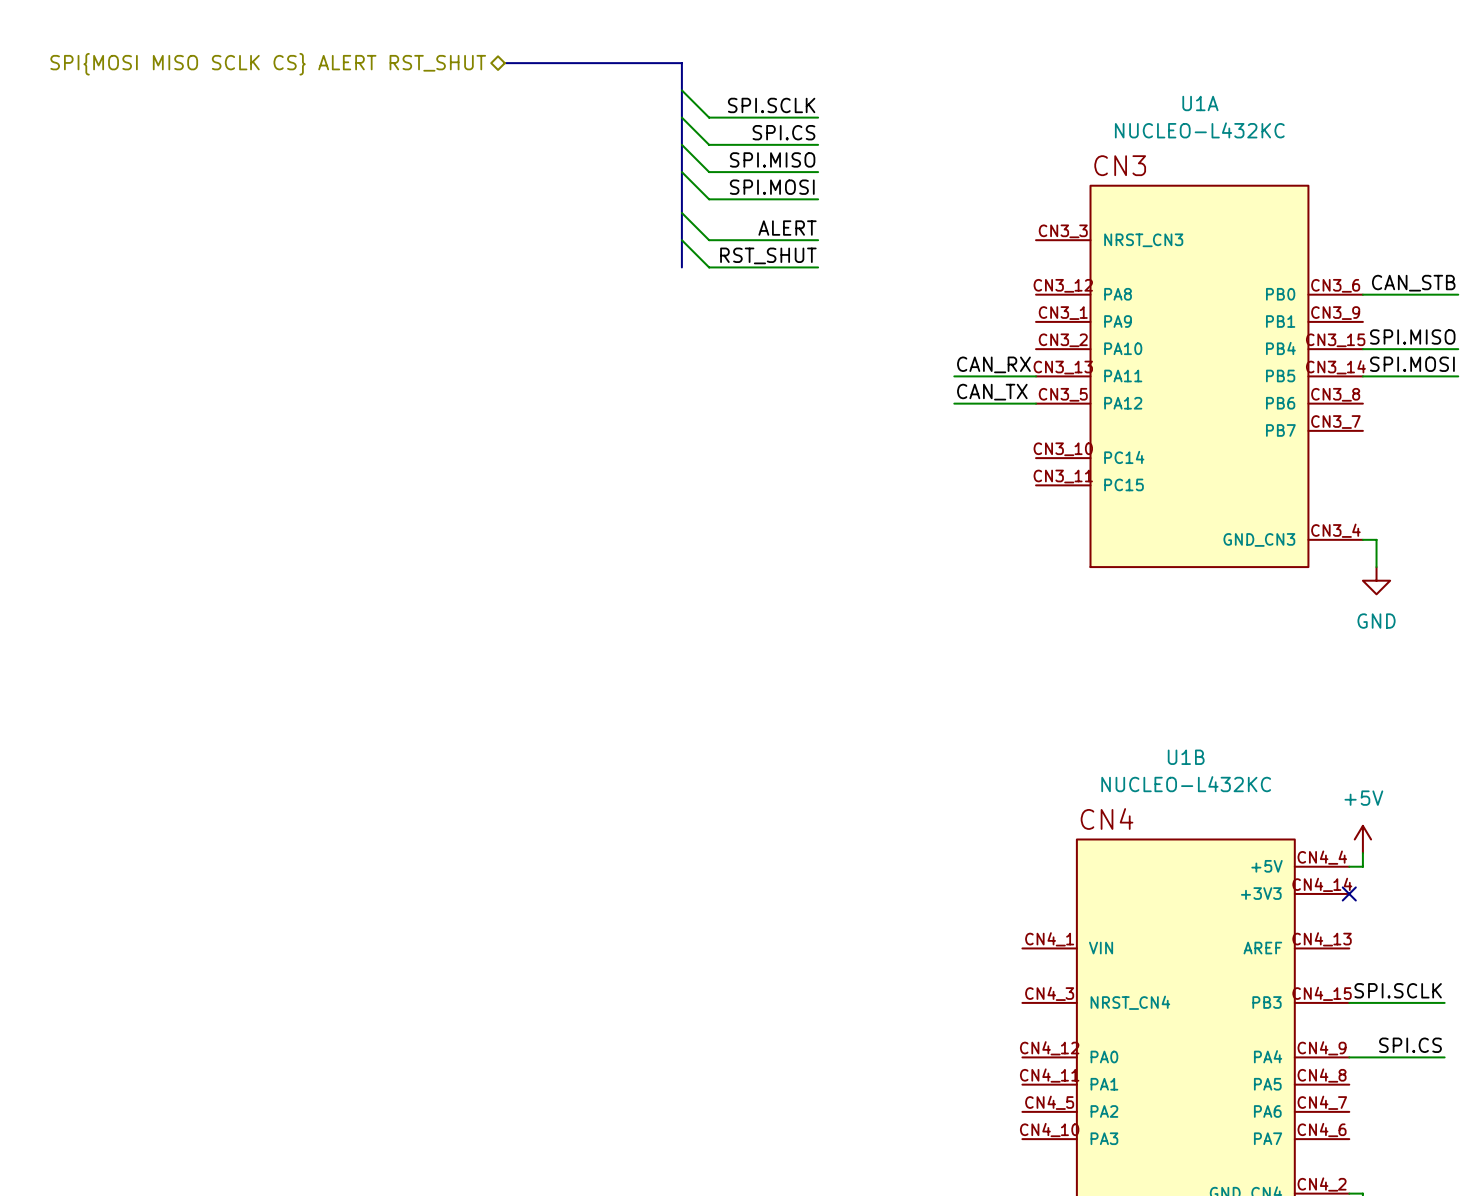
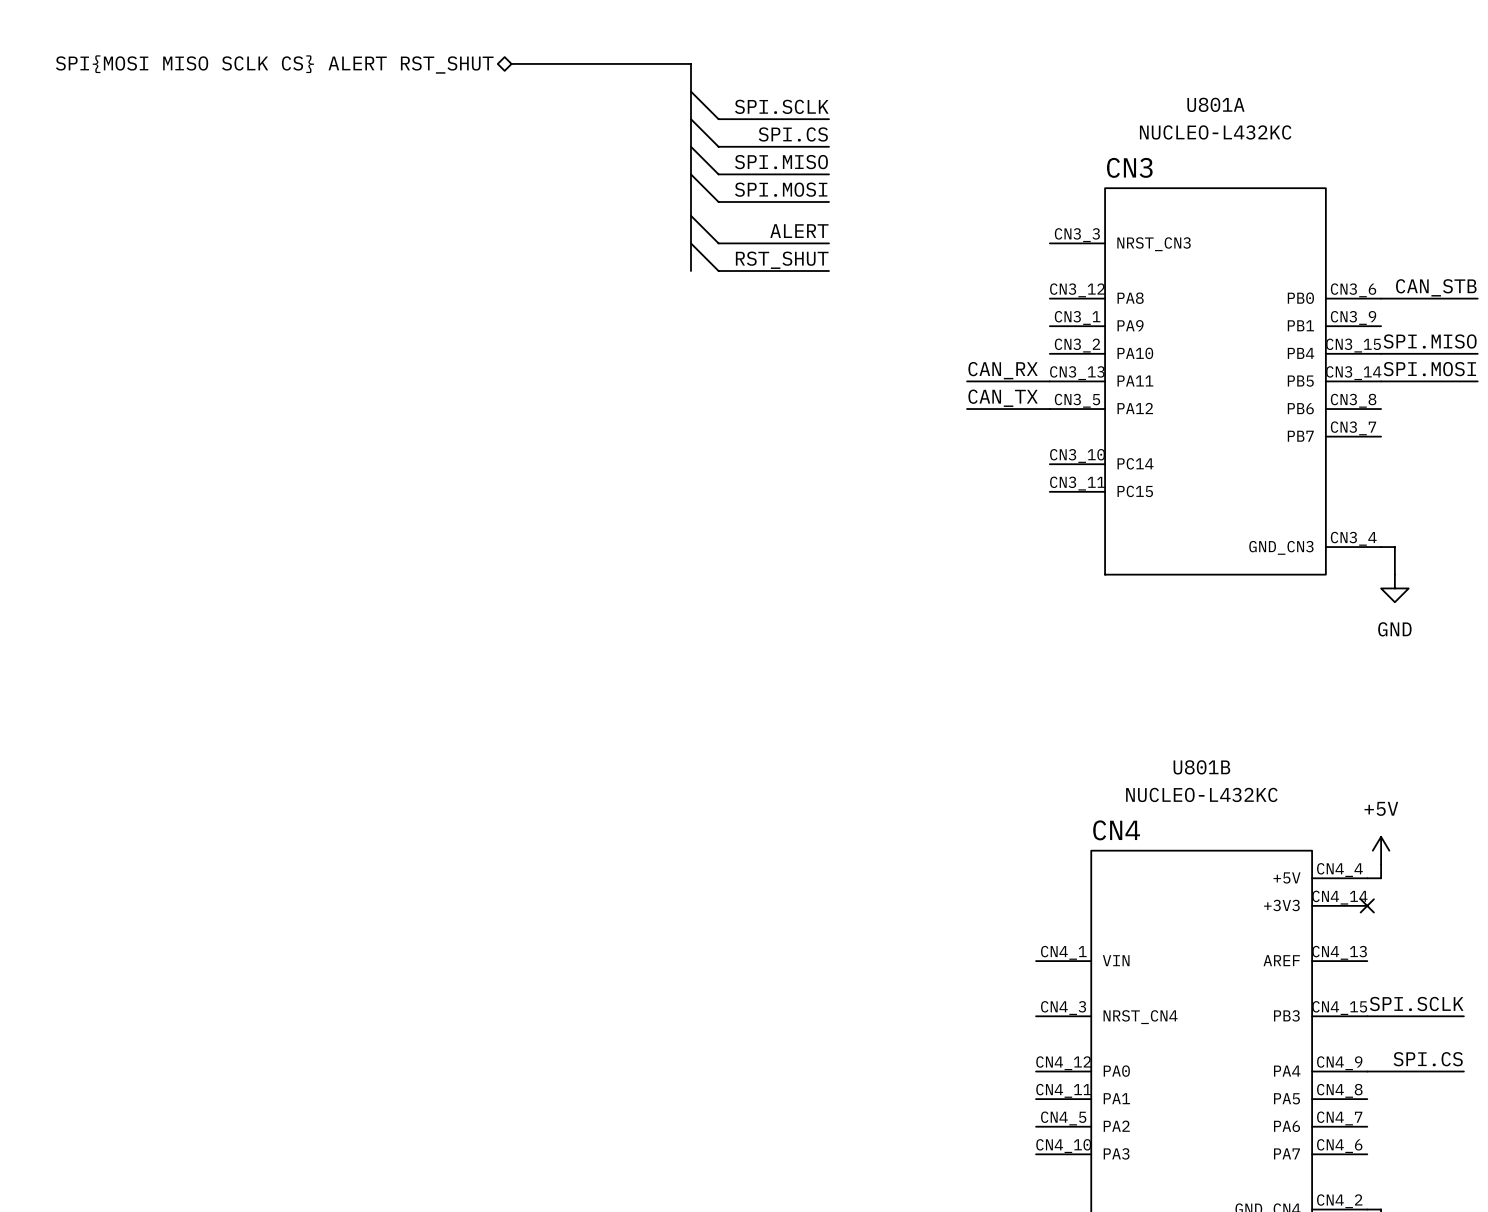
U1A name: U1A (1200, 103) -> U801A (1215, 104)
U1B name: U1B (1186, 757) -> U801B (1201, 767)

